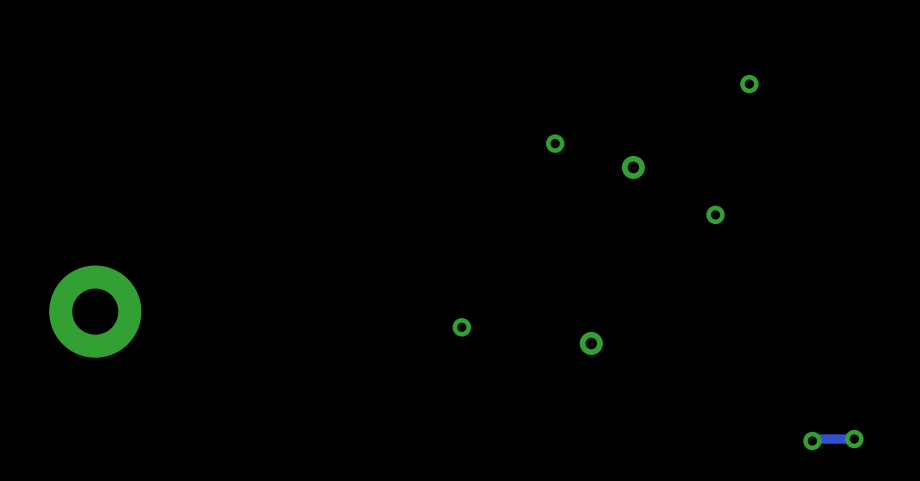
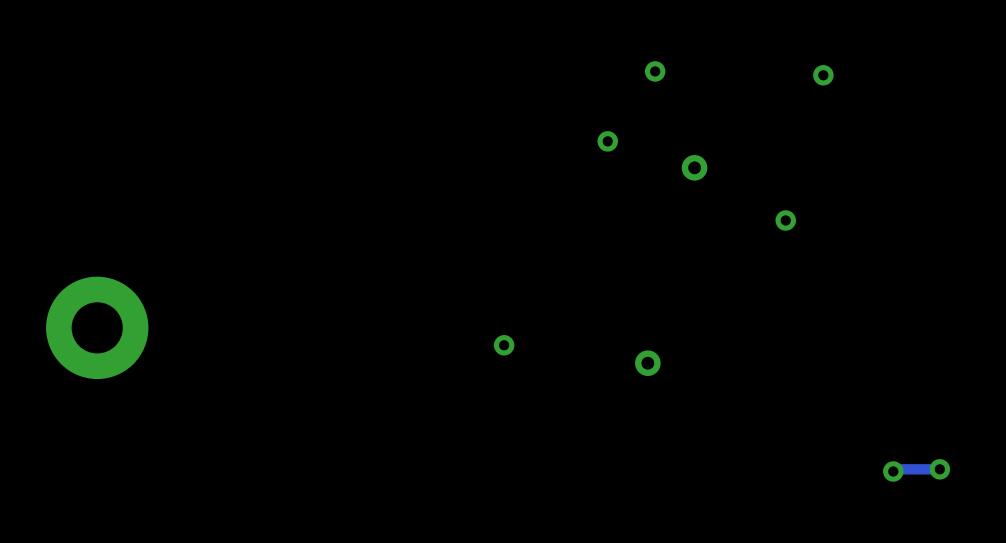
via: none -> (655, 71)

